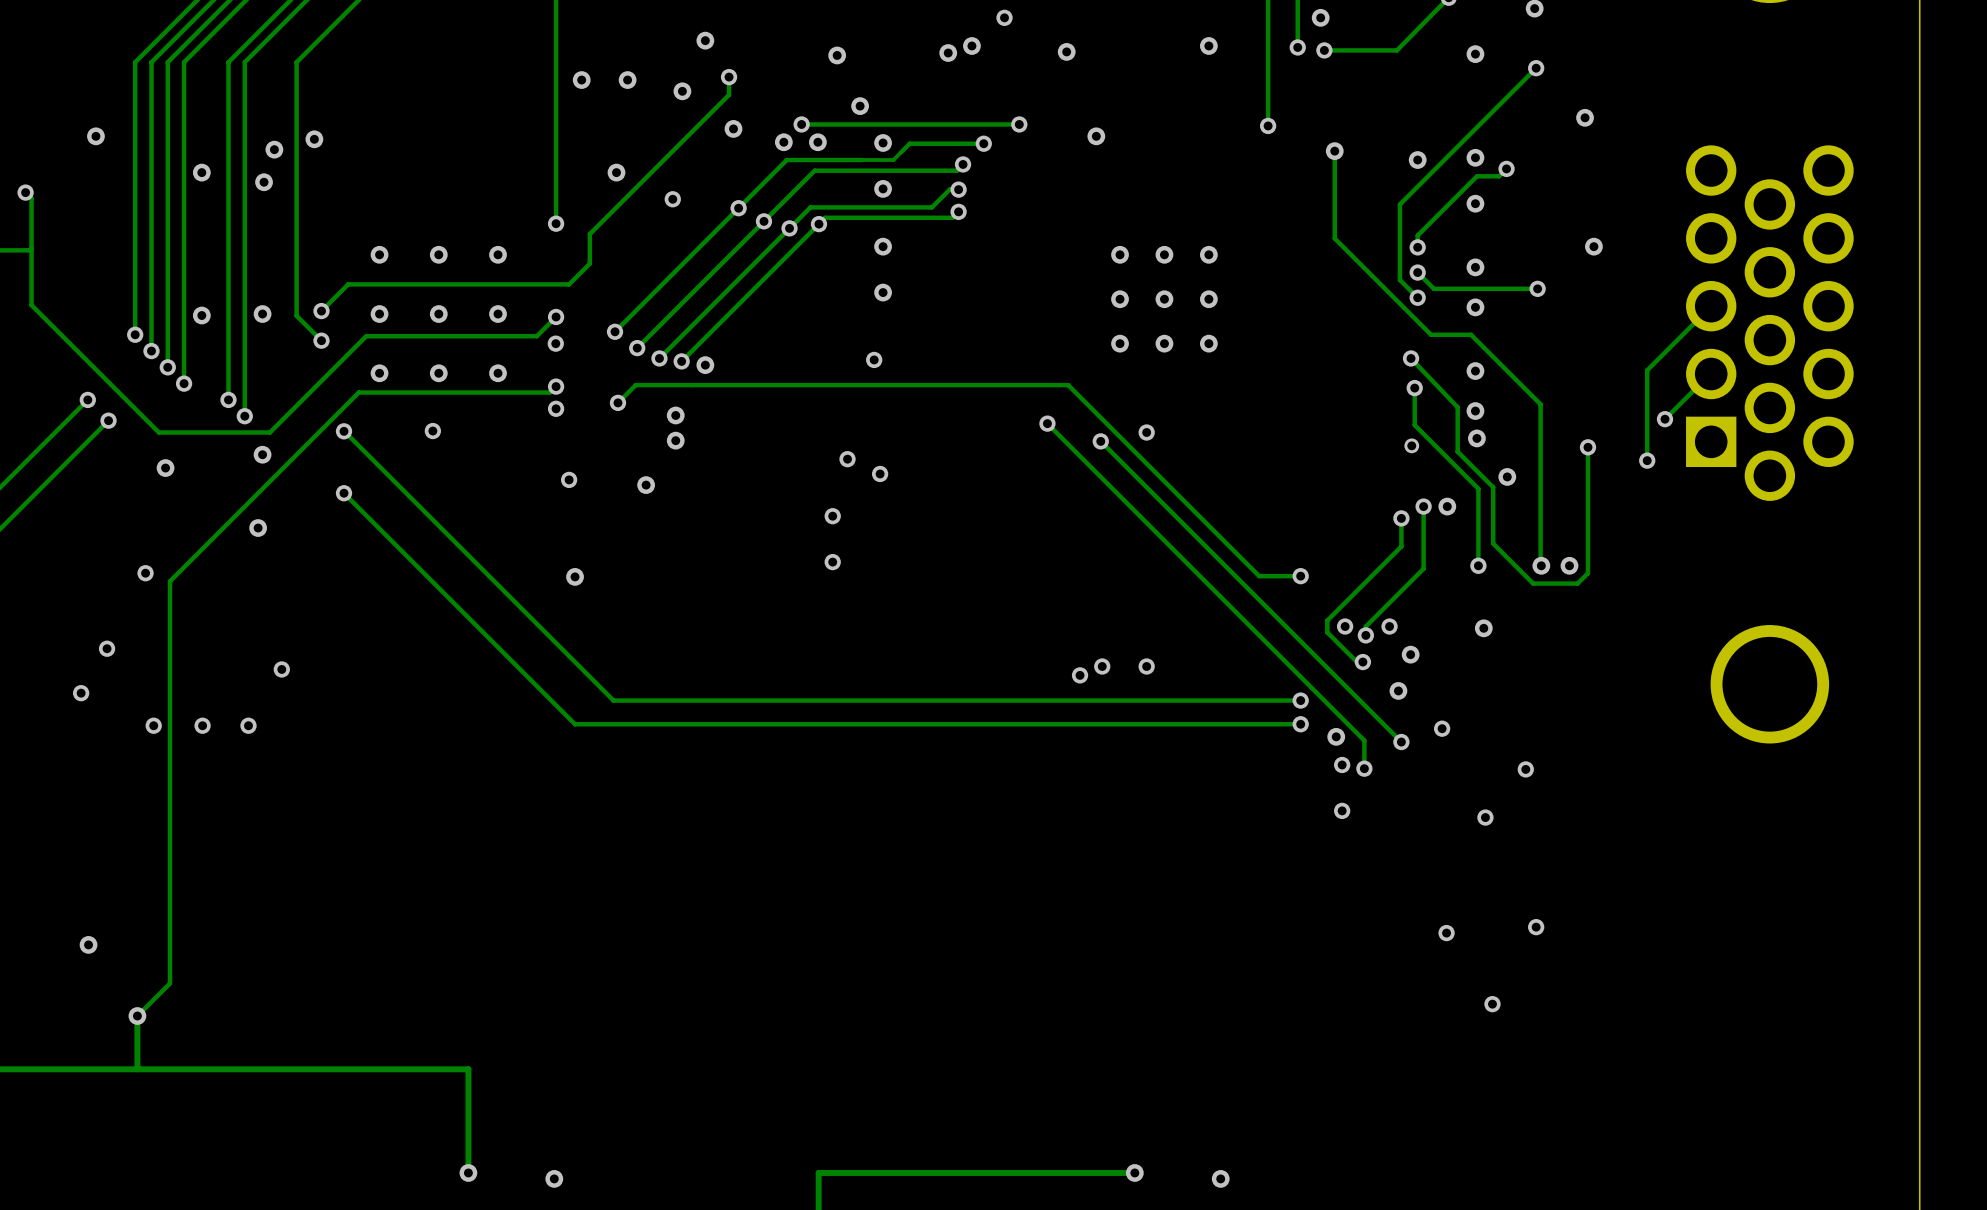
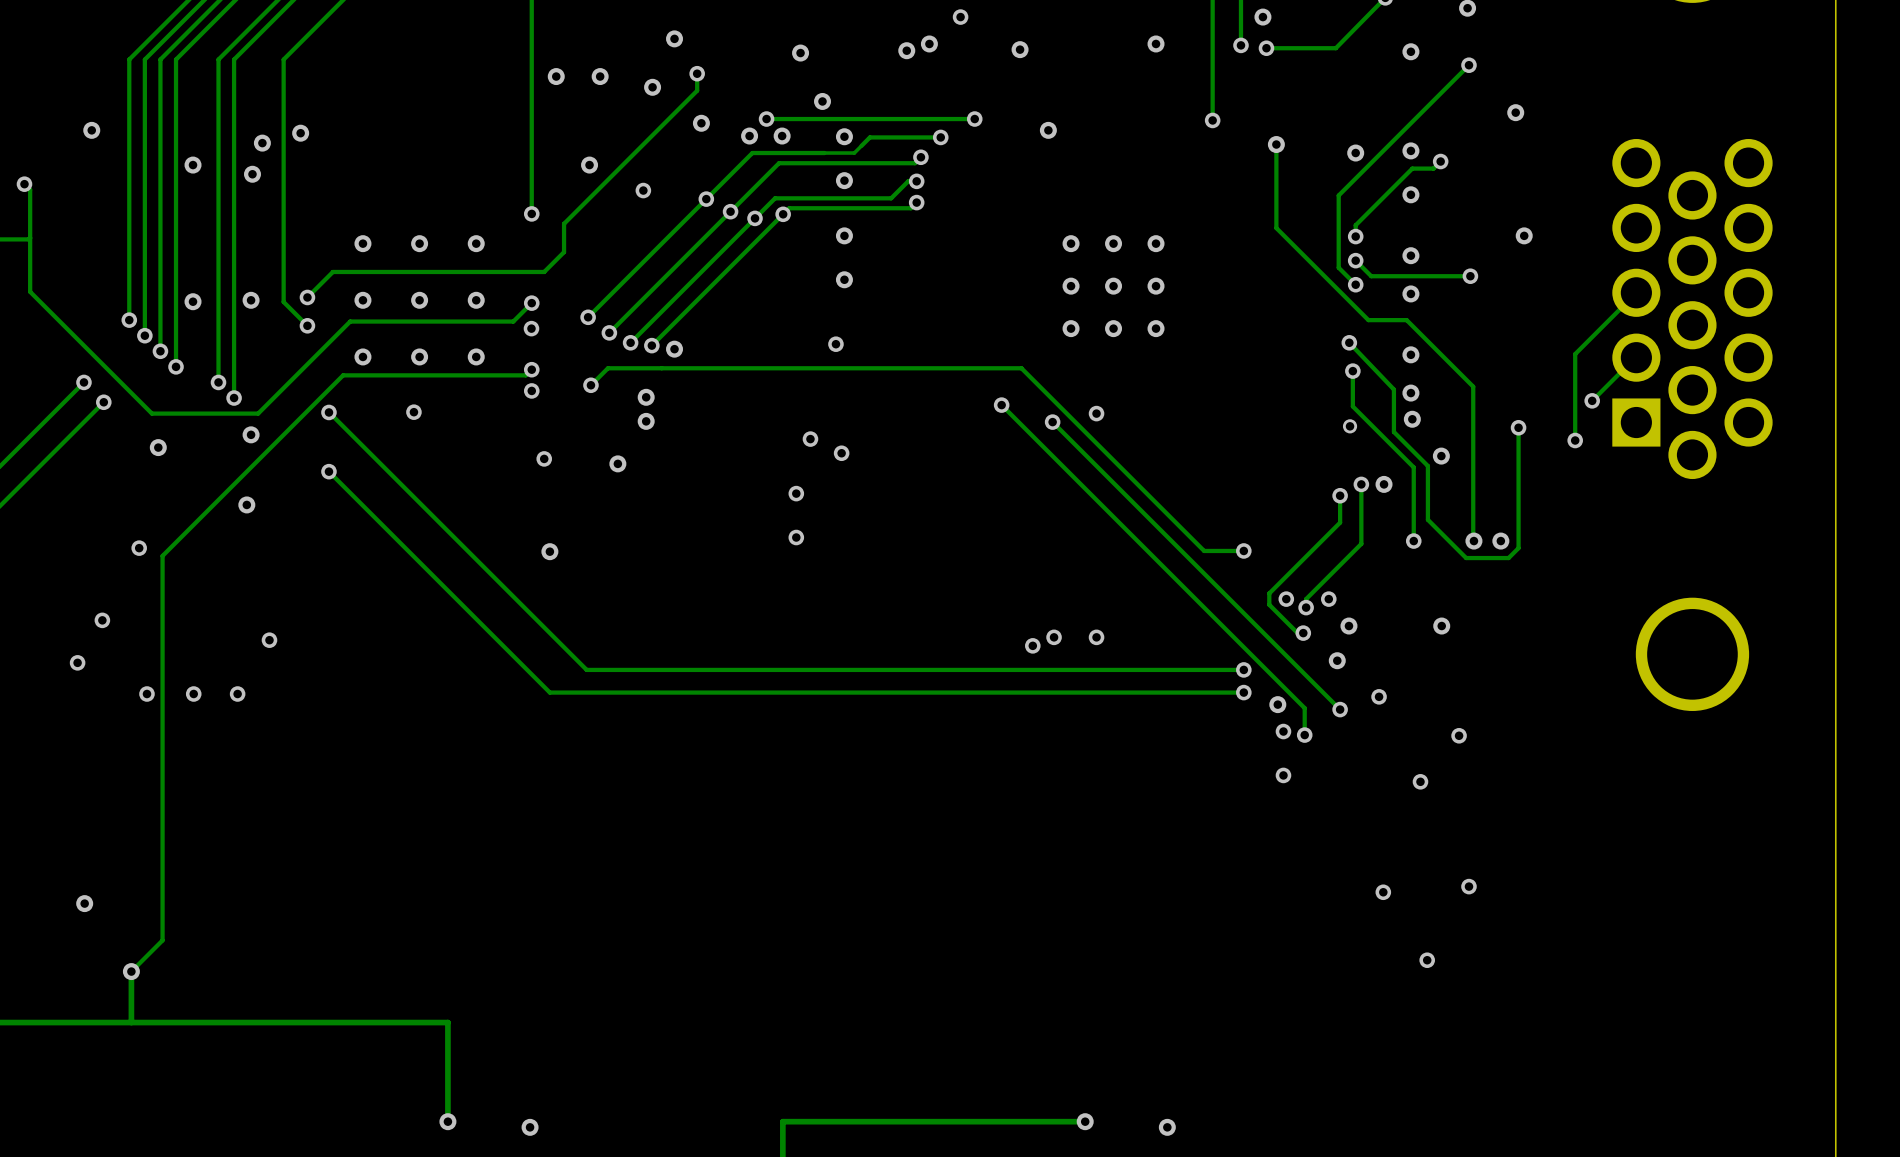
via position: (1483, 628) -> (1441, 626)

